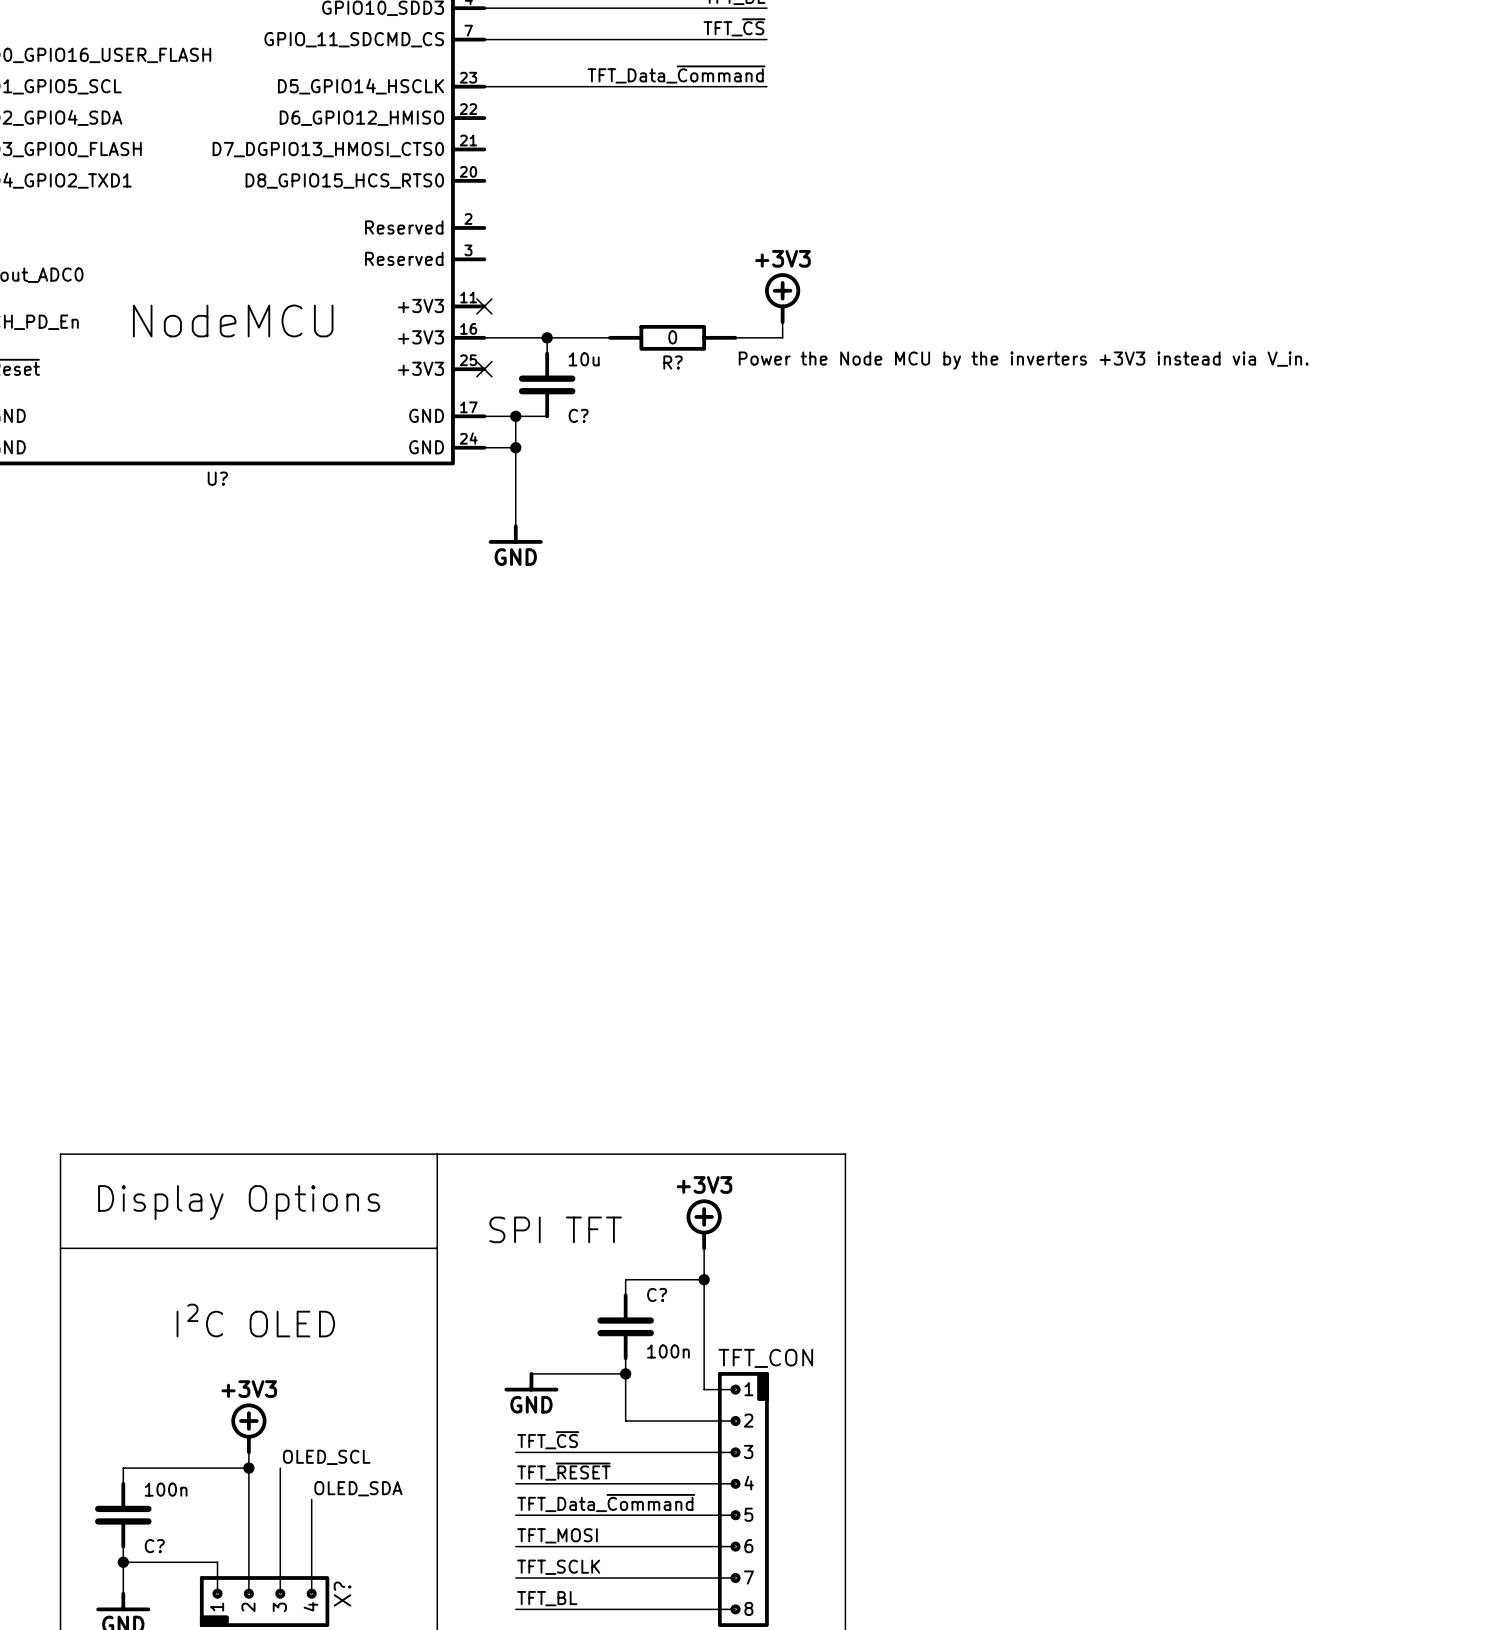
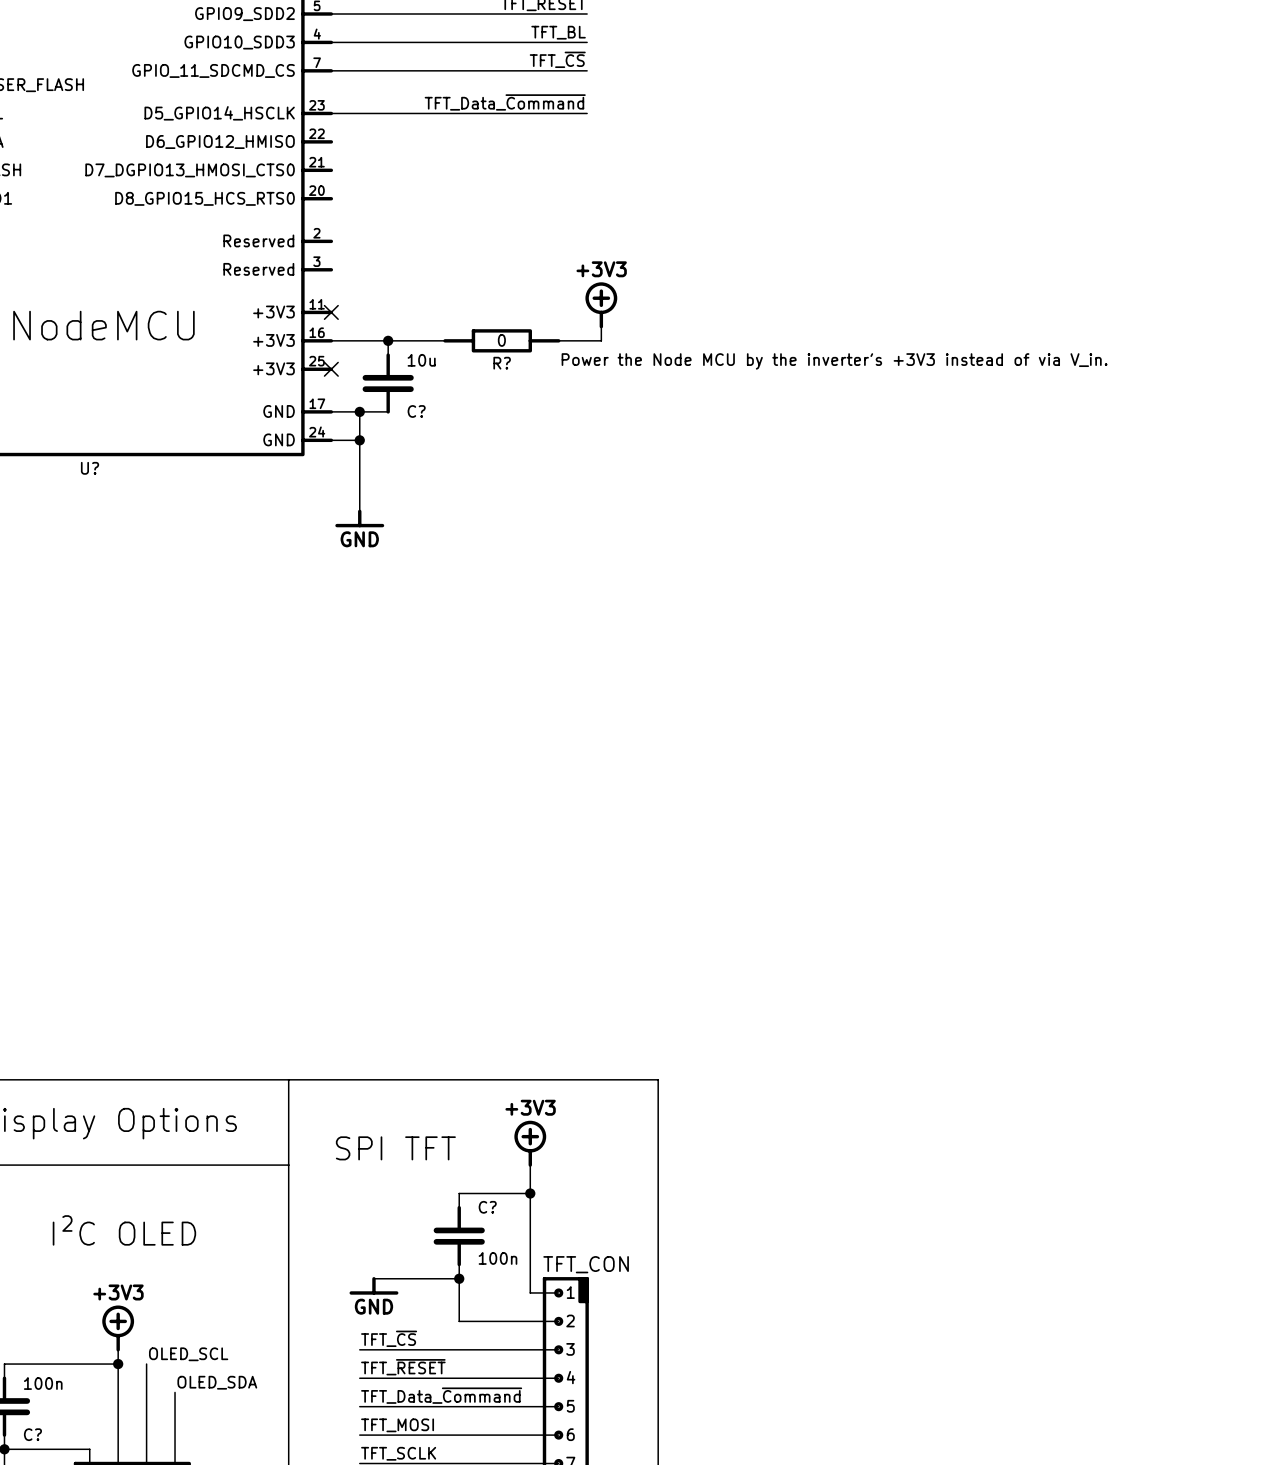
text: Power the Node MCU by the inverters +3V3 instead via V_in. (1023, 360) -> Power the Node MCU by the inverter's +3V3 instead of via V_in. (834, 361)

